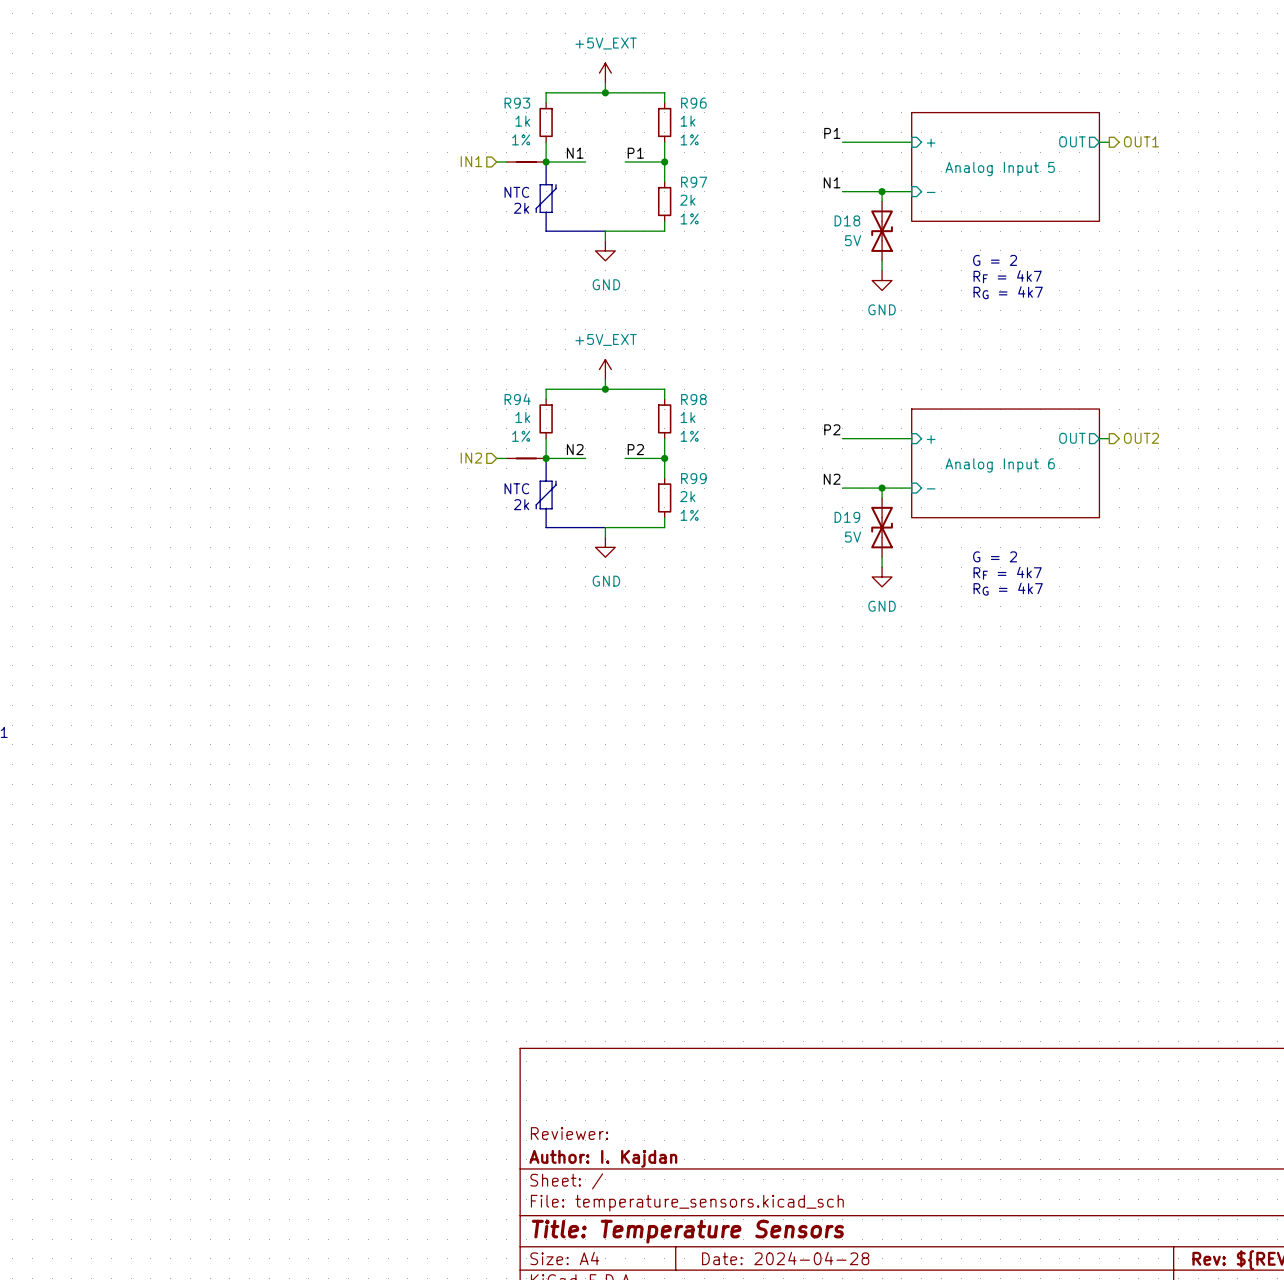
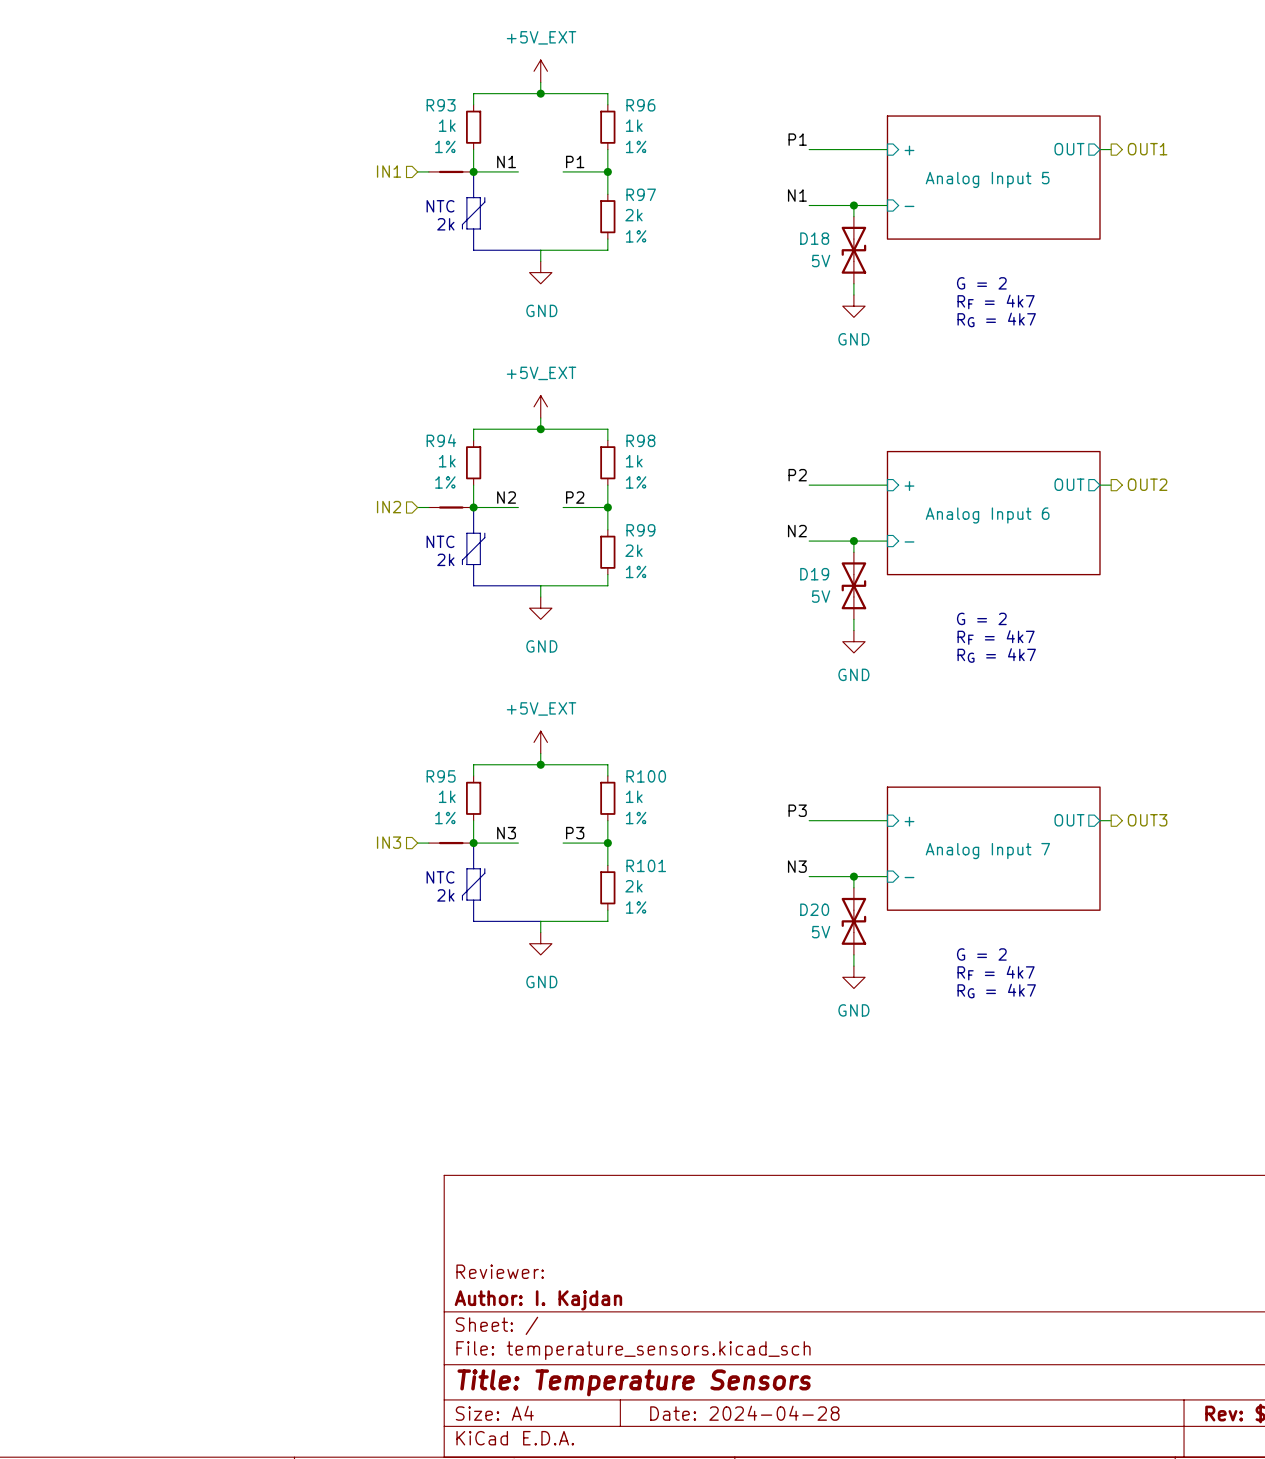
power symbol: none -> +5V_EXT (540, 742)
wire: none -> (540, 753) (540, 764)
junction: none -> (540, 764)
wire: none -> (473, 775) (473, 764) (607, 764) (607, 775)
R95: none -> 1k (473, 798)
R100: none -> 1k (607, 798)
label: none -> P3 (797, 810)
sheet pin: none -> OUT (1069, 820)
hierarchical label: none -> OUT3 (1147, 820)
wire: none -> (473, 820) (473, 843) (518, 843)
wire: none -> (607, 820) (607, 865)
wire: none -> (809, 820) (887, 820)
sheet pin: none -> + (909, 821)
wire: none -> (1100, 820) (1111, 820)
label: none -> N3 (506, 833)
label: none -> P3 (575, 833)
hierarchical label: none -> IN3 (389, 842)
wire: none -> (417, 843) (428, 843)
part: none -> (451, 843)
line: none -> (473, 843) (473, 868)
junction: none -> (473, 843)
wire: none -> (563, 843) (607, 843)
junction: none -> (607, 843)
sheet Analog Input 7: none -> (993, 848)
label: none -> N3 (797, 866)
line: none -> (466, 868) (466, 900) (480, 900) (480, 868) (466, 868)
line: none -> (484, 868) (484, 873) (462, 895) (462, 900)
wire: none -> (809, 876) (887, 876)
wire: none -> (853, 876) (853, 887)
junction: none -> (853, 876)
text: none -> NTC (440, 877)
sheet pin: none -> - (909, 877)
R101: none -> 2k (607, 887)
text: none -> 2k (445, 895)
line: none -> (473, 900) (473, 921) (540, 921)
wire: none -> (607, 910) (607, 921) (540, 921) (540, 932)
D20: none -> 5V (853, 921)
power symbol: none -> GND (540, 943)
wire: none -> (853, 954) (853, 966)
text: none -> G = 2 (981, 954)
text: none -> RF = 4k7 (996, 973)
power symbol: none -> GND (853, 977)
text: none -> RG = 4k7 (996, 991)

